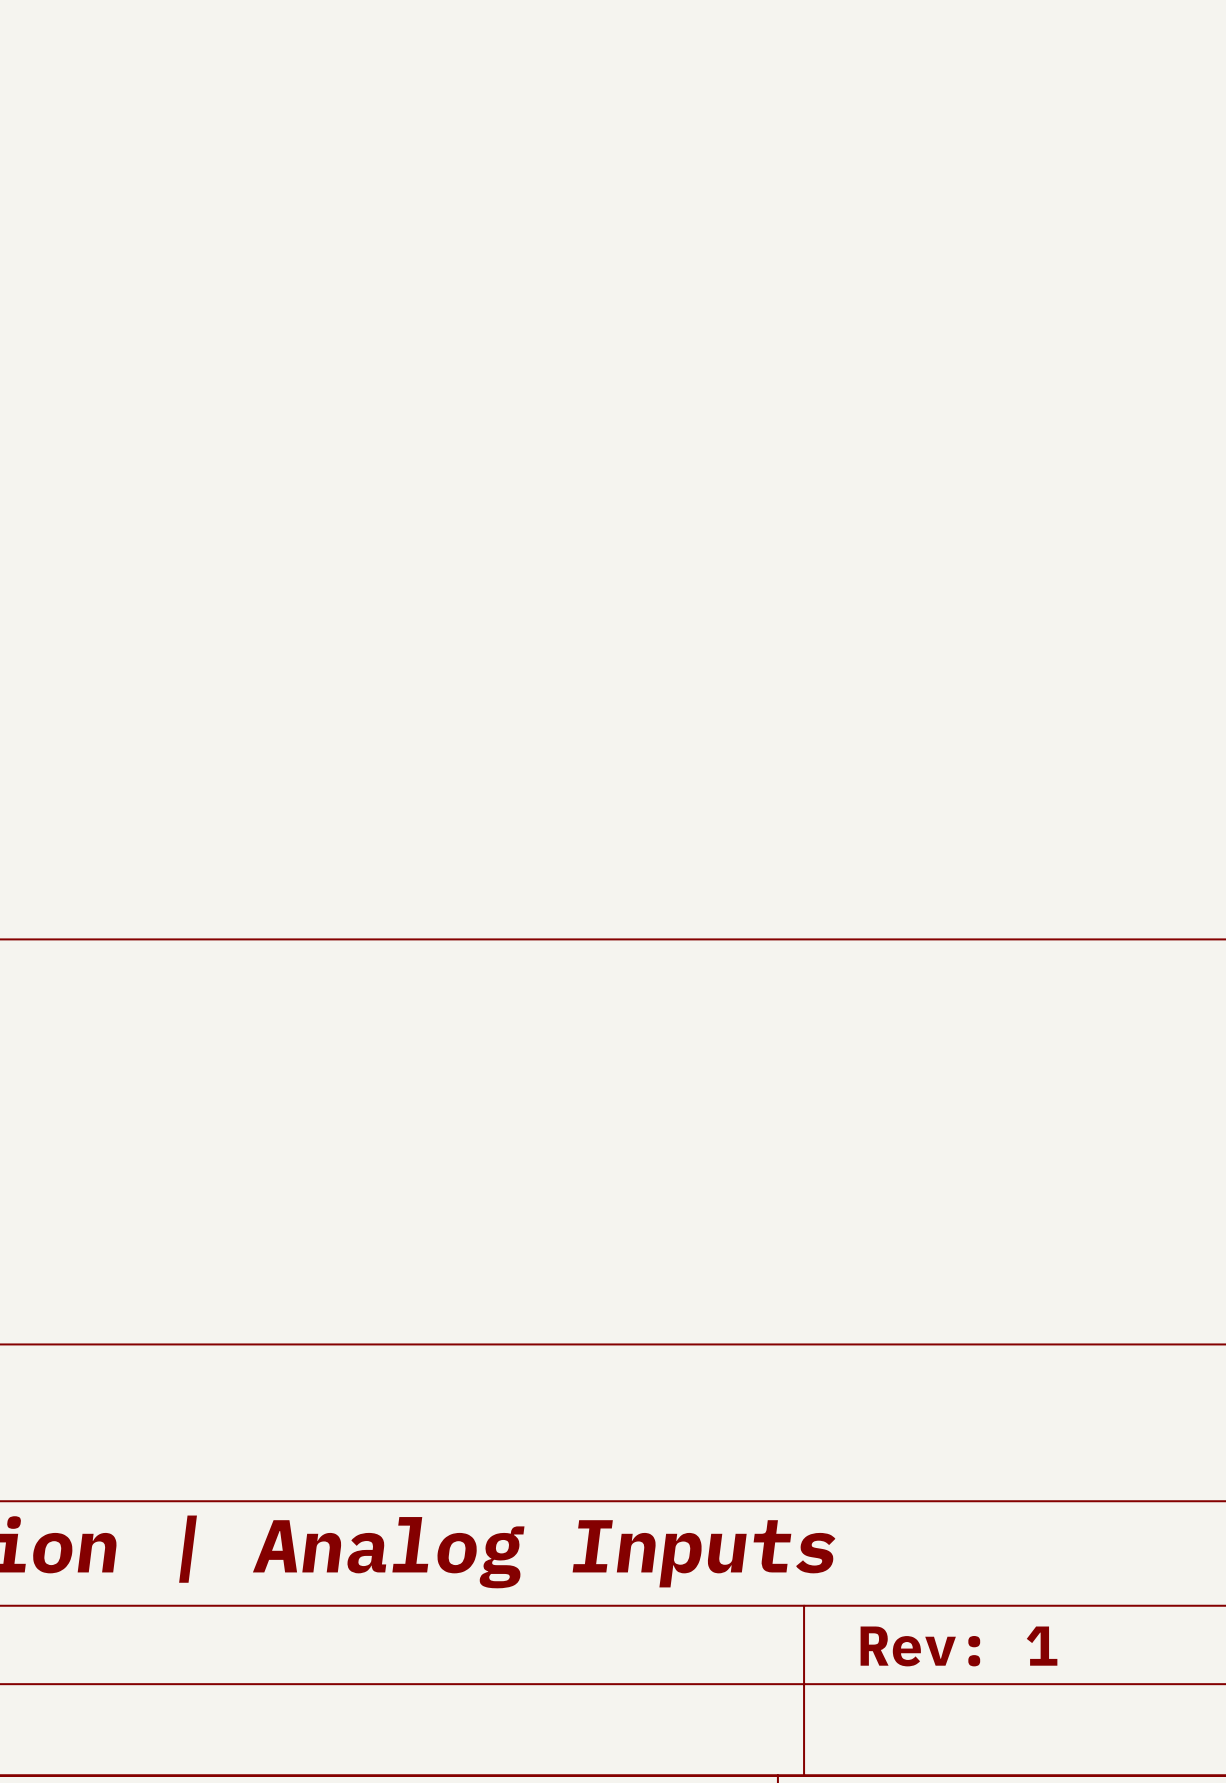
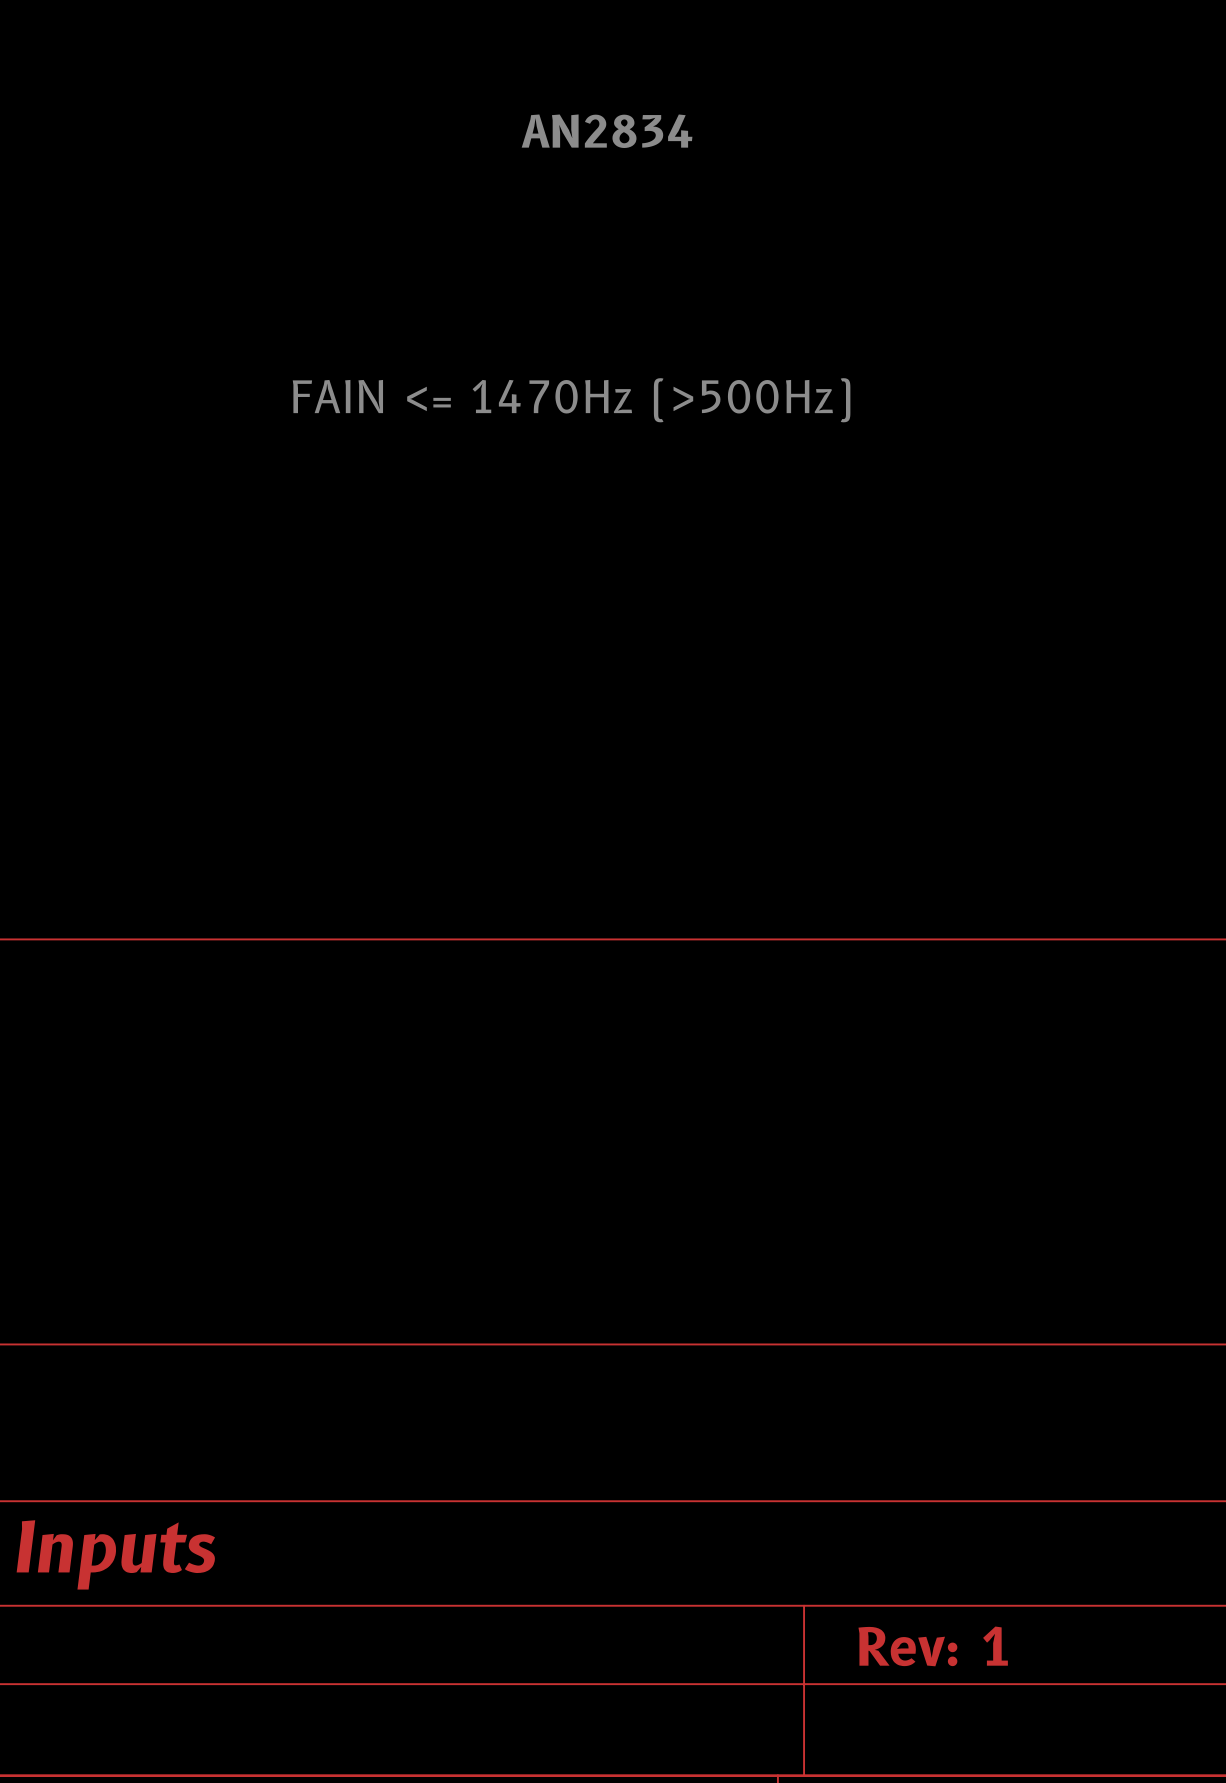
text: none -> AN2834 (607, 131)
text: none -> FAIN <= 1470Hz (>500Hz) (571, 400)

